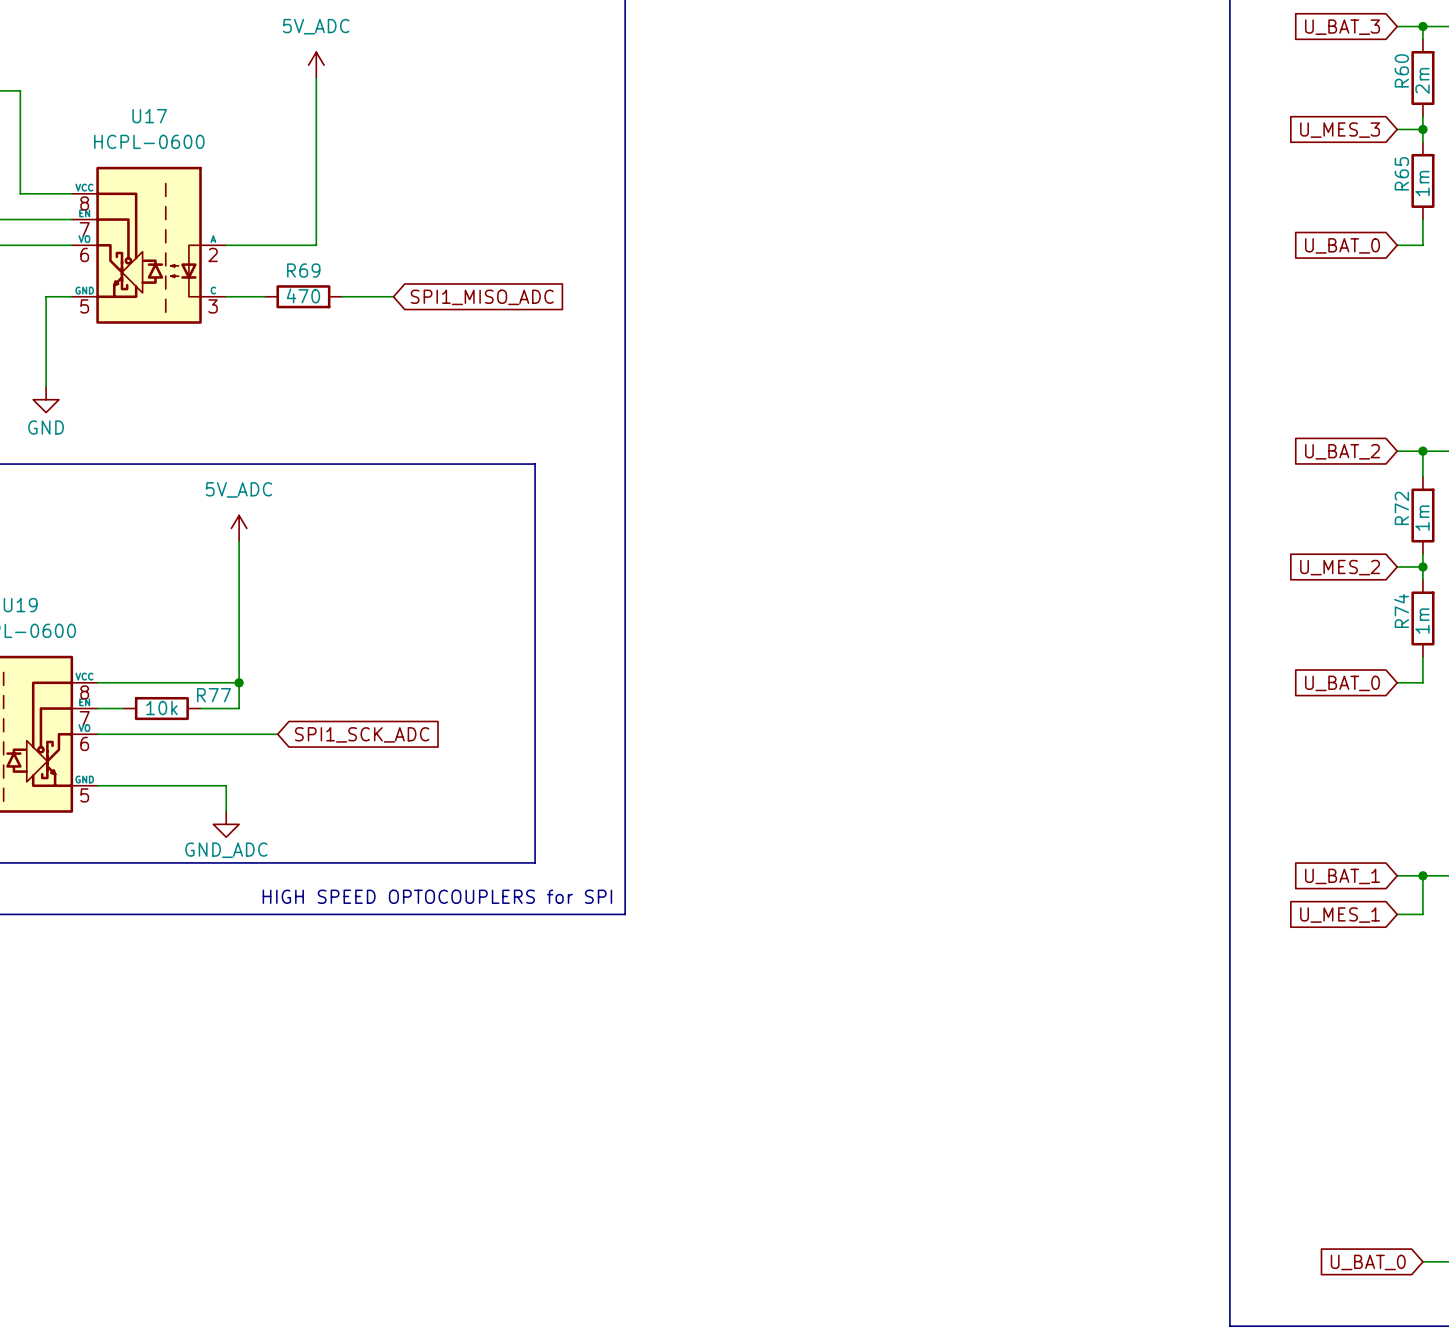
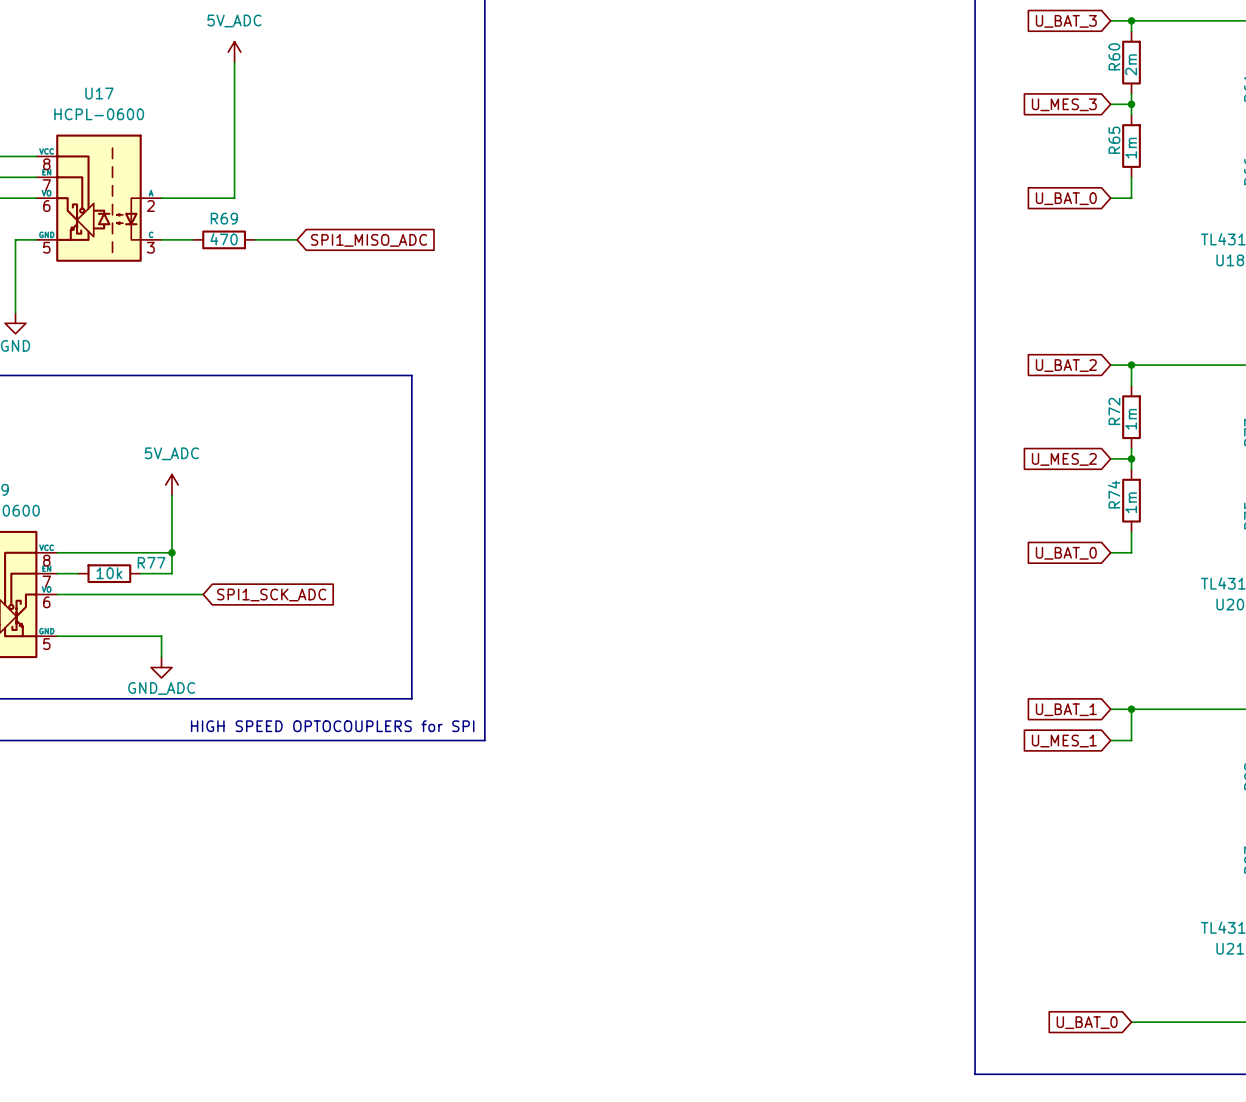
power symbol position: 5V_ADC (239, 528) -> 5V_ADC (171, 485)
wire: (239, 541) (239, 612) -> none

